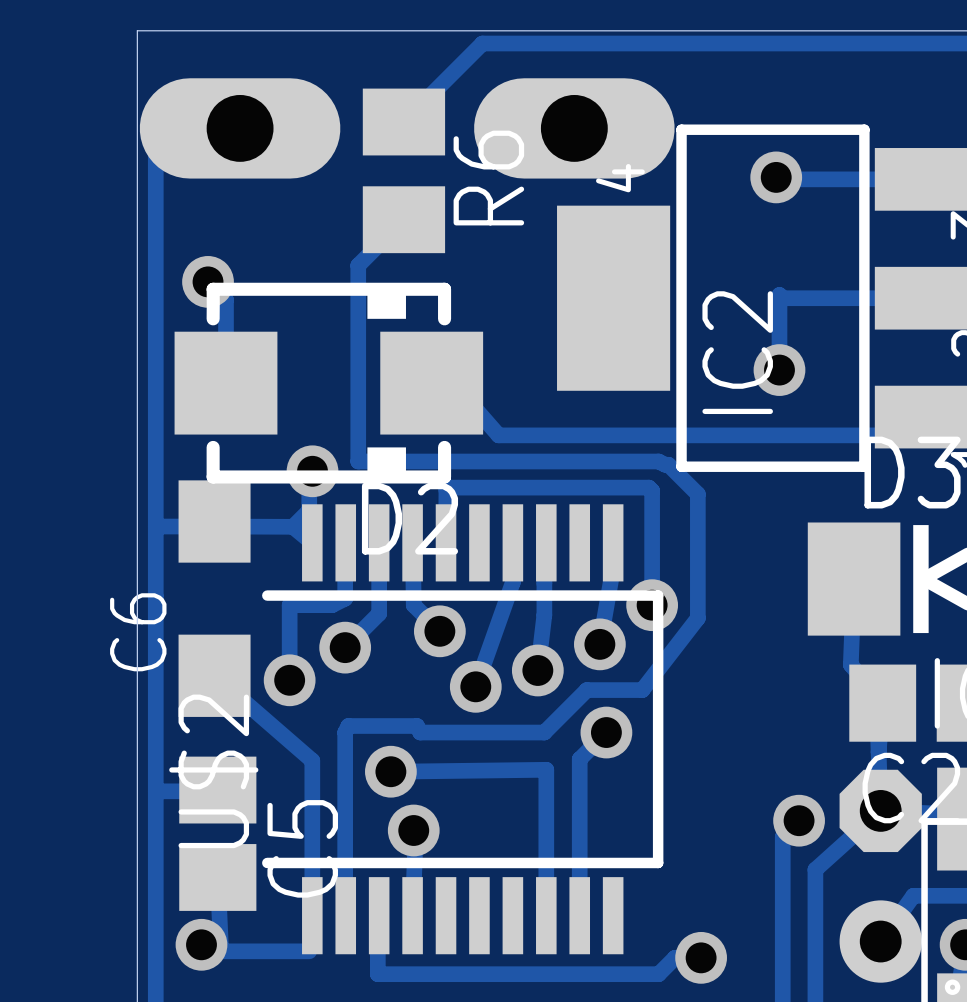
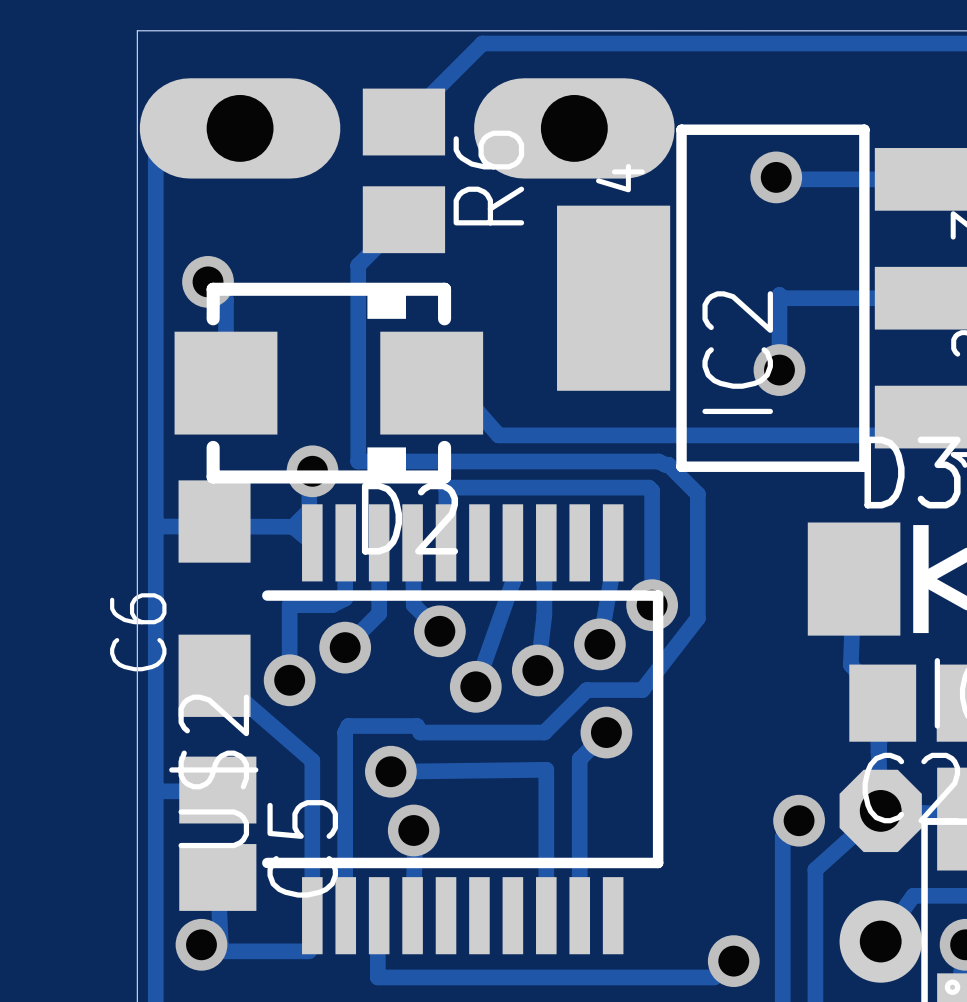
track: (701, 957) (674, 957) (658, 974) (377, 974) -> (733, 961) (714, 977) (377, 977) (377, 974)
via position: (701, 957) -> (733, 961)

